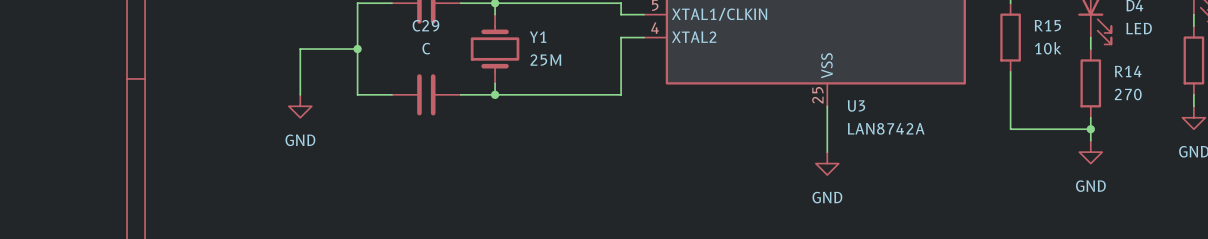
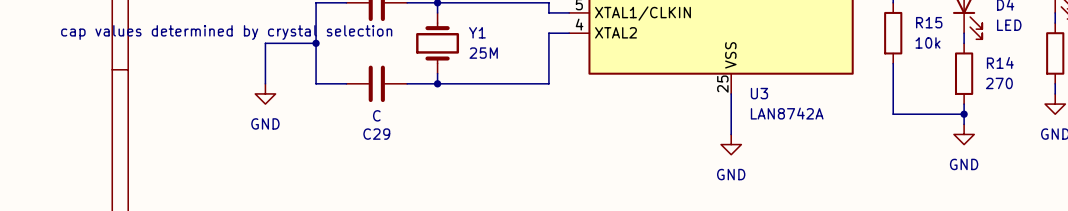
C29 name position: C29 (425, 25) -> C29 (376, 134)
text: none -> cap values determined by crystal selection (226, 32)
C29 value position: C (426, 48) -> C (376, 115)

